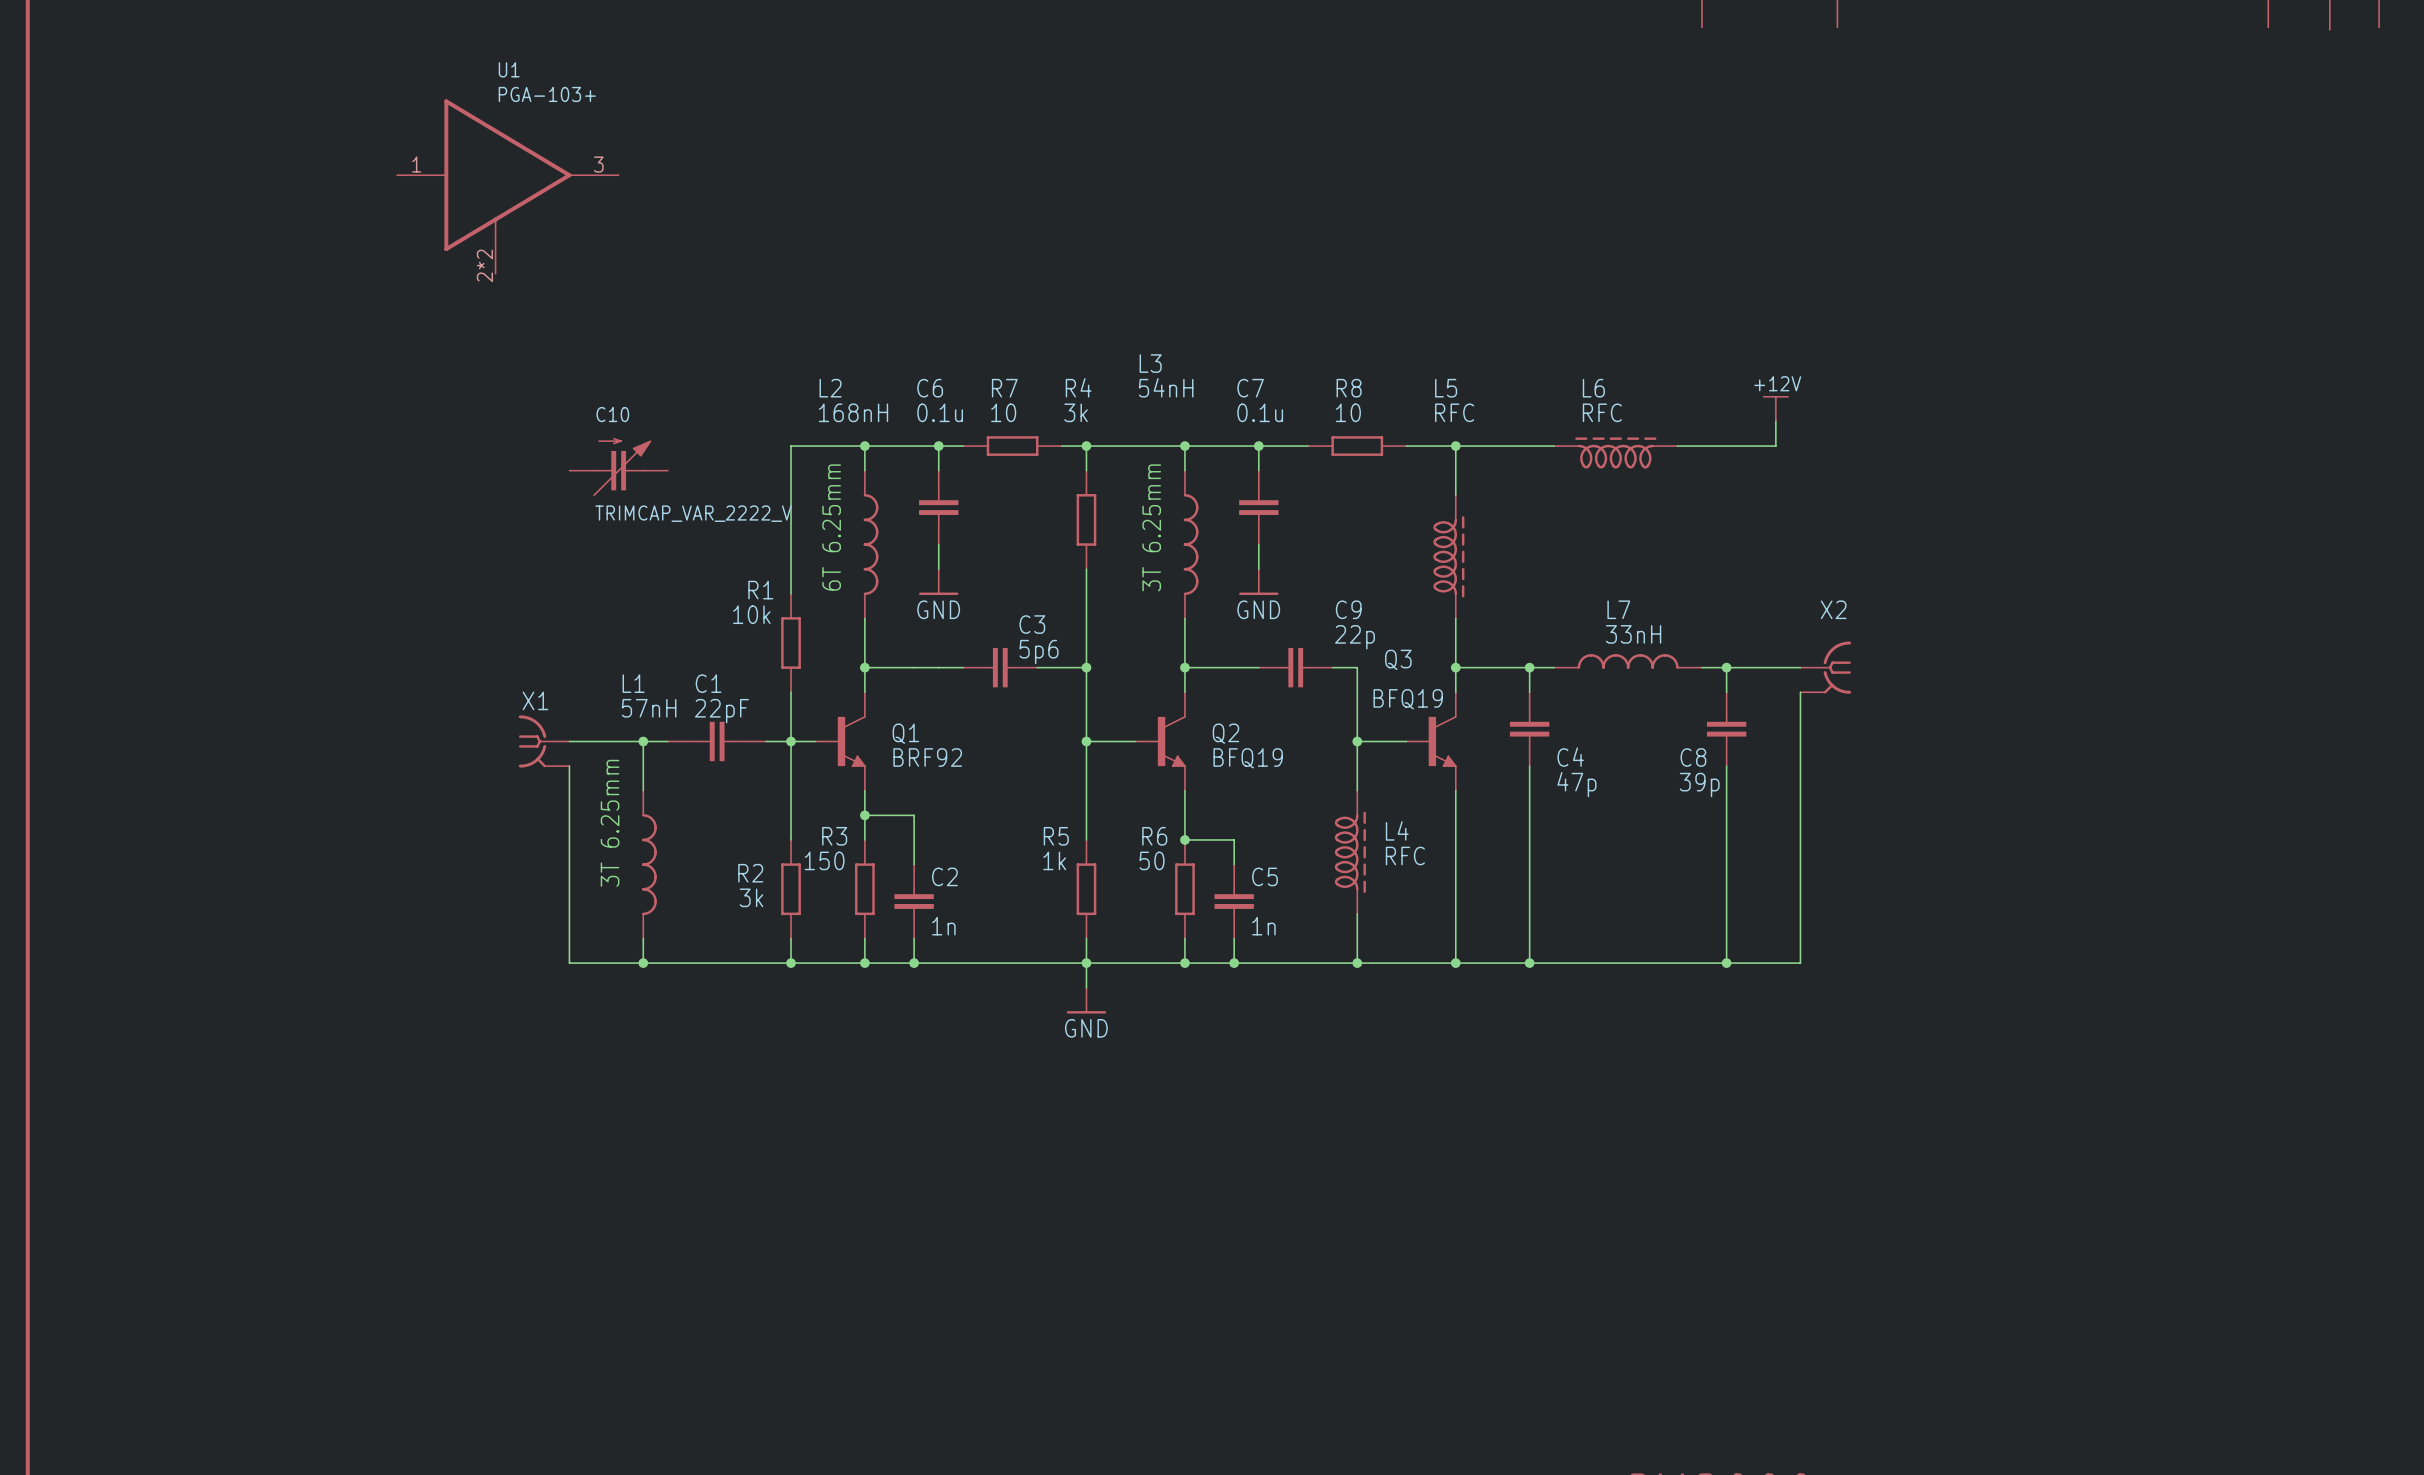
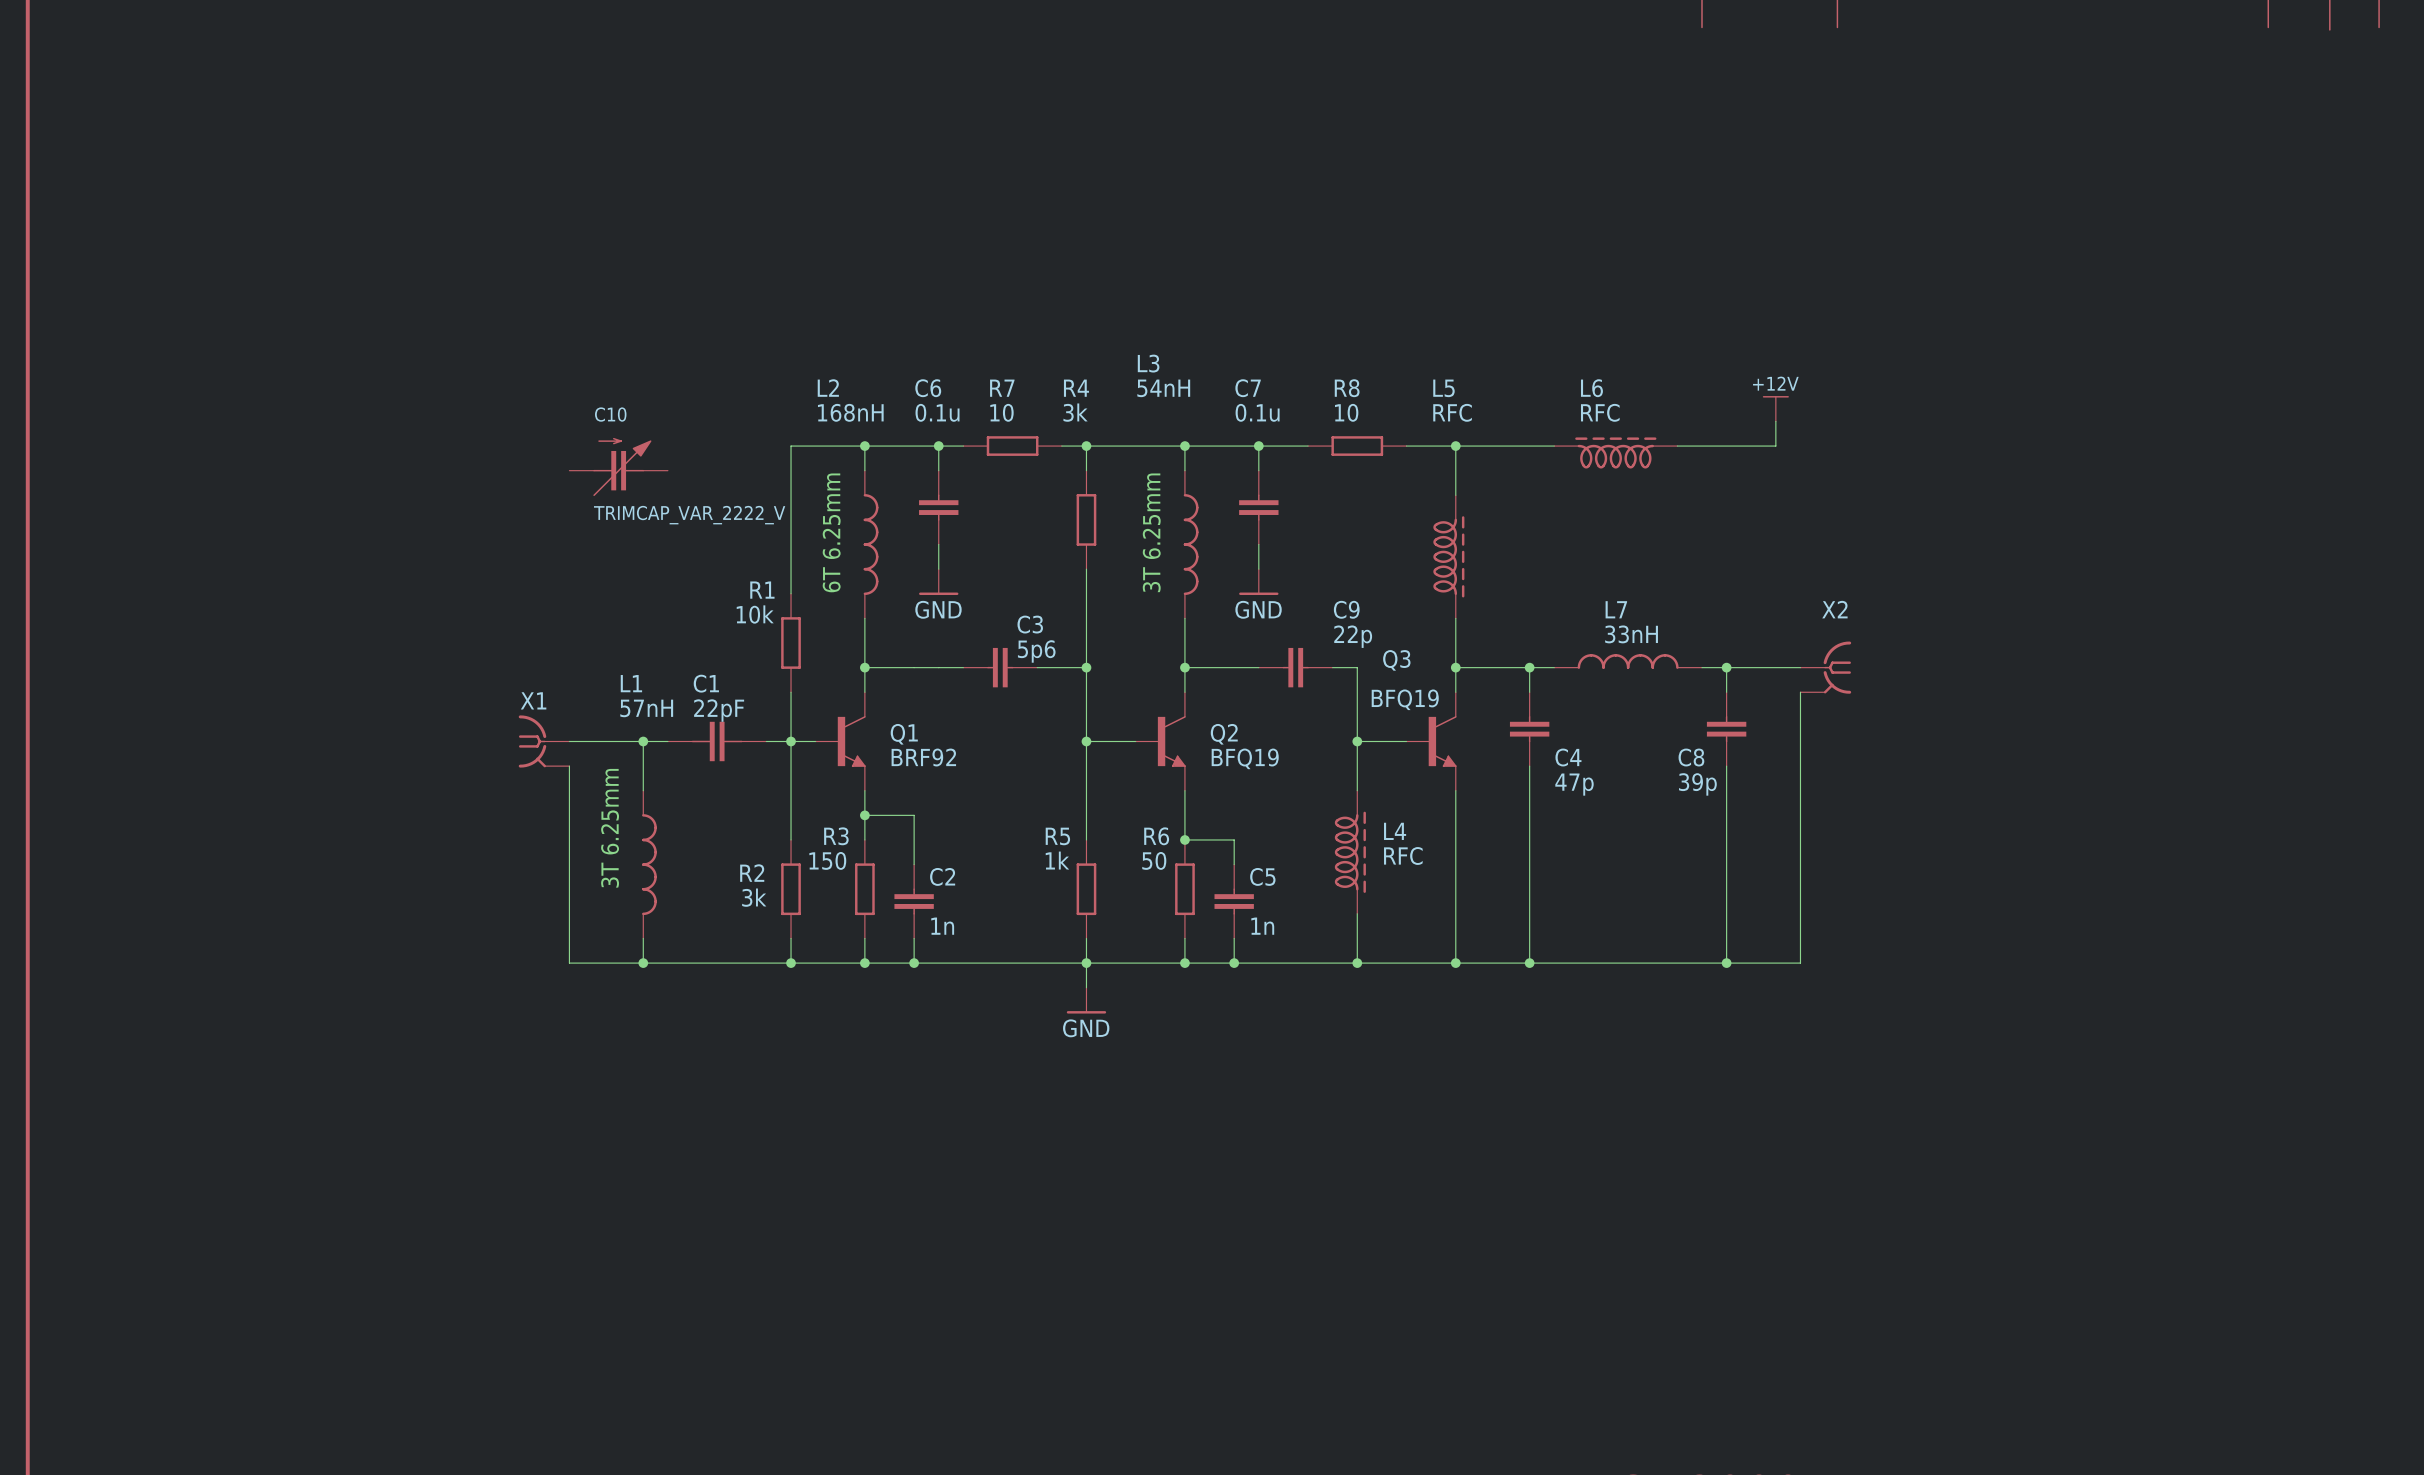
U1: PGA-103+ (507, 186) -> none

